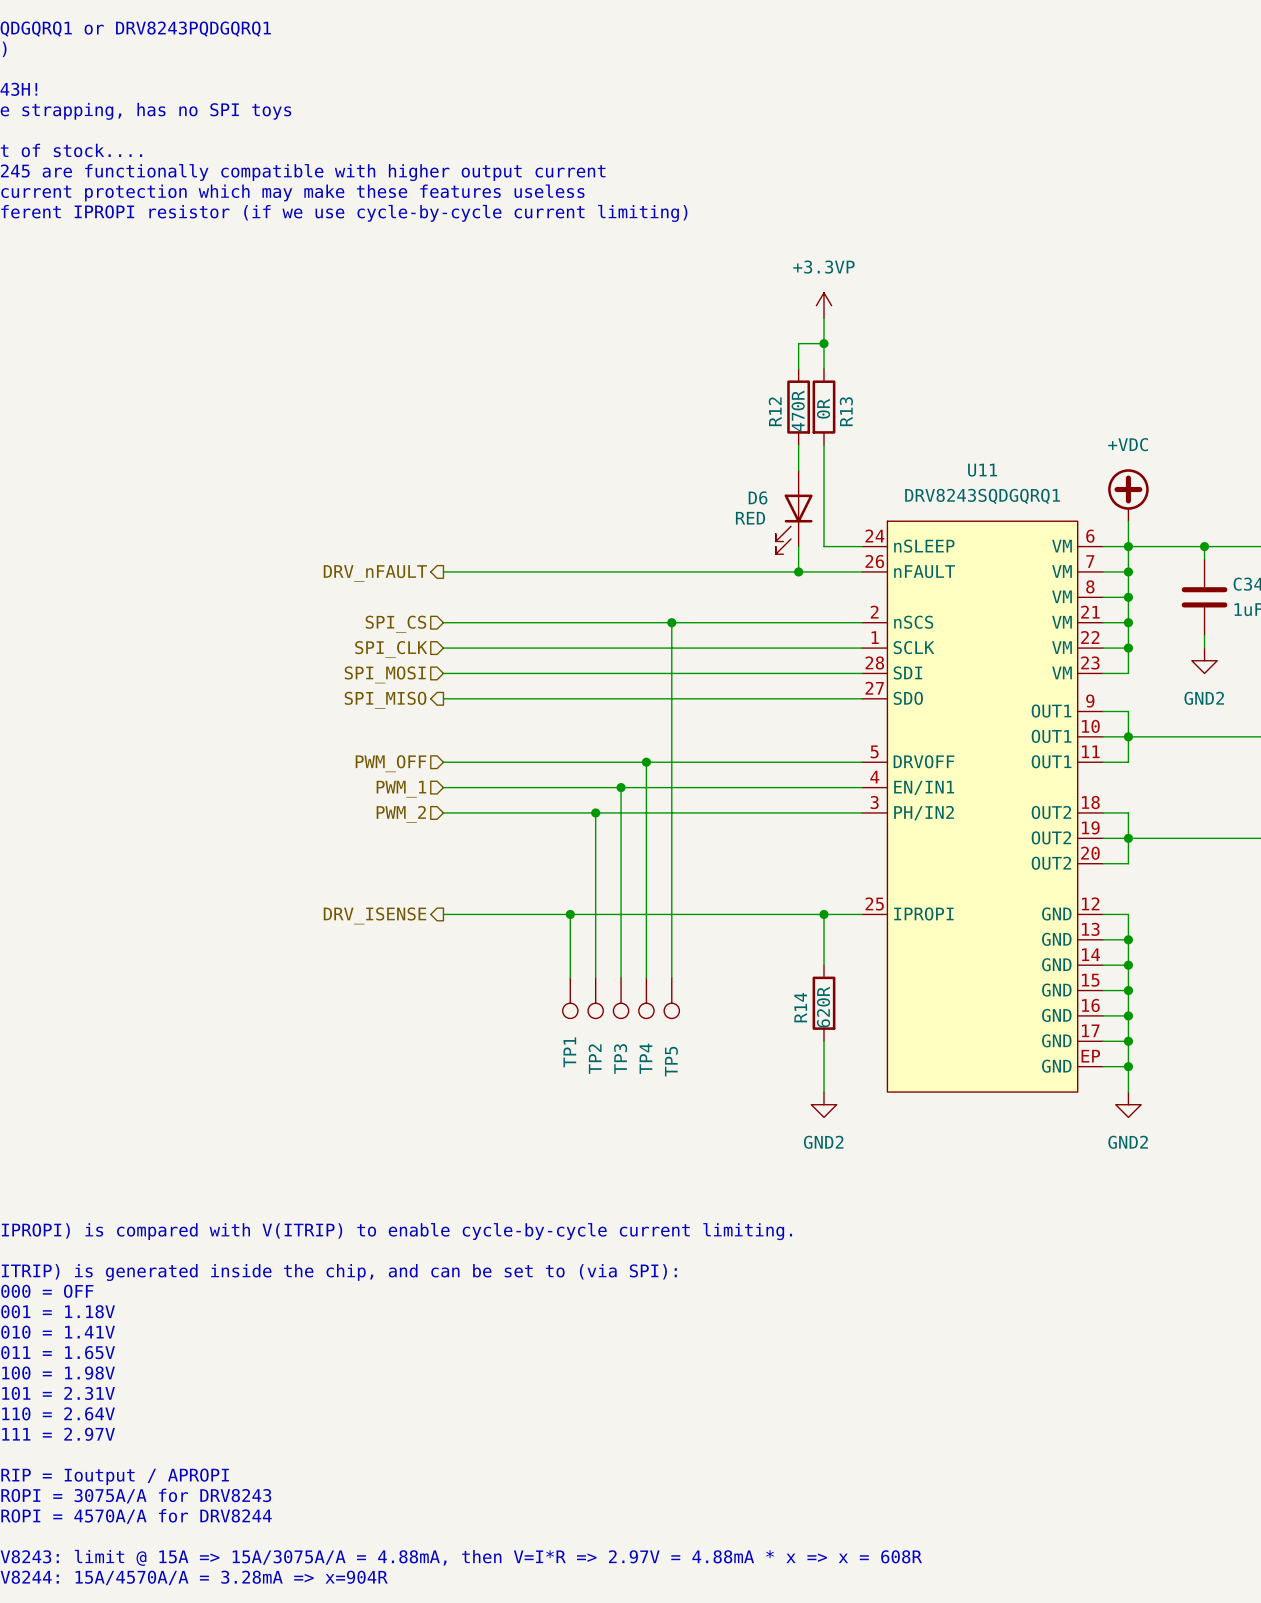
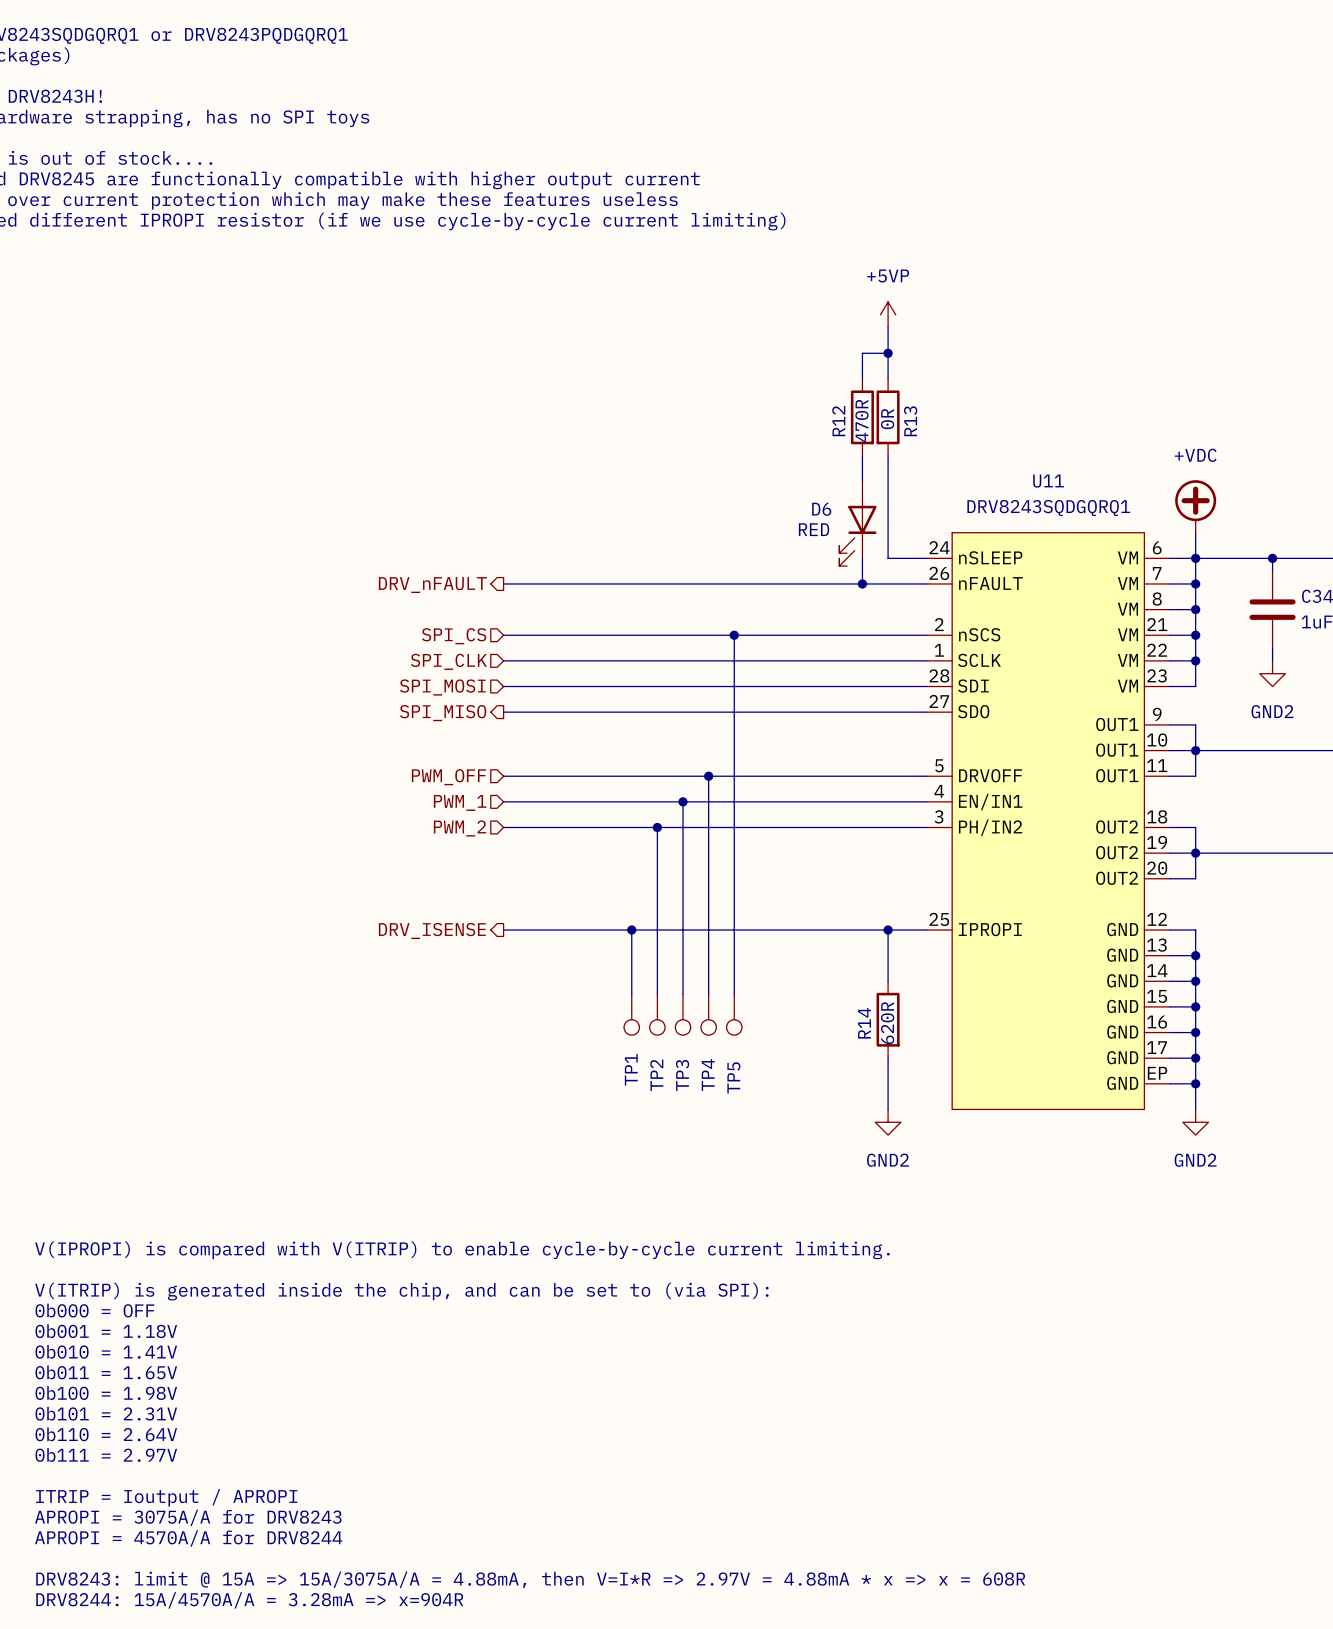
power symbol: +3.3VP (823, 305) -> +5VP (888, 314)

